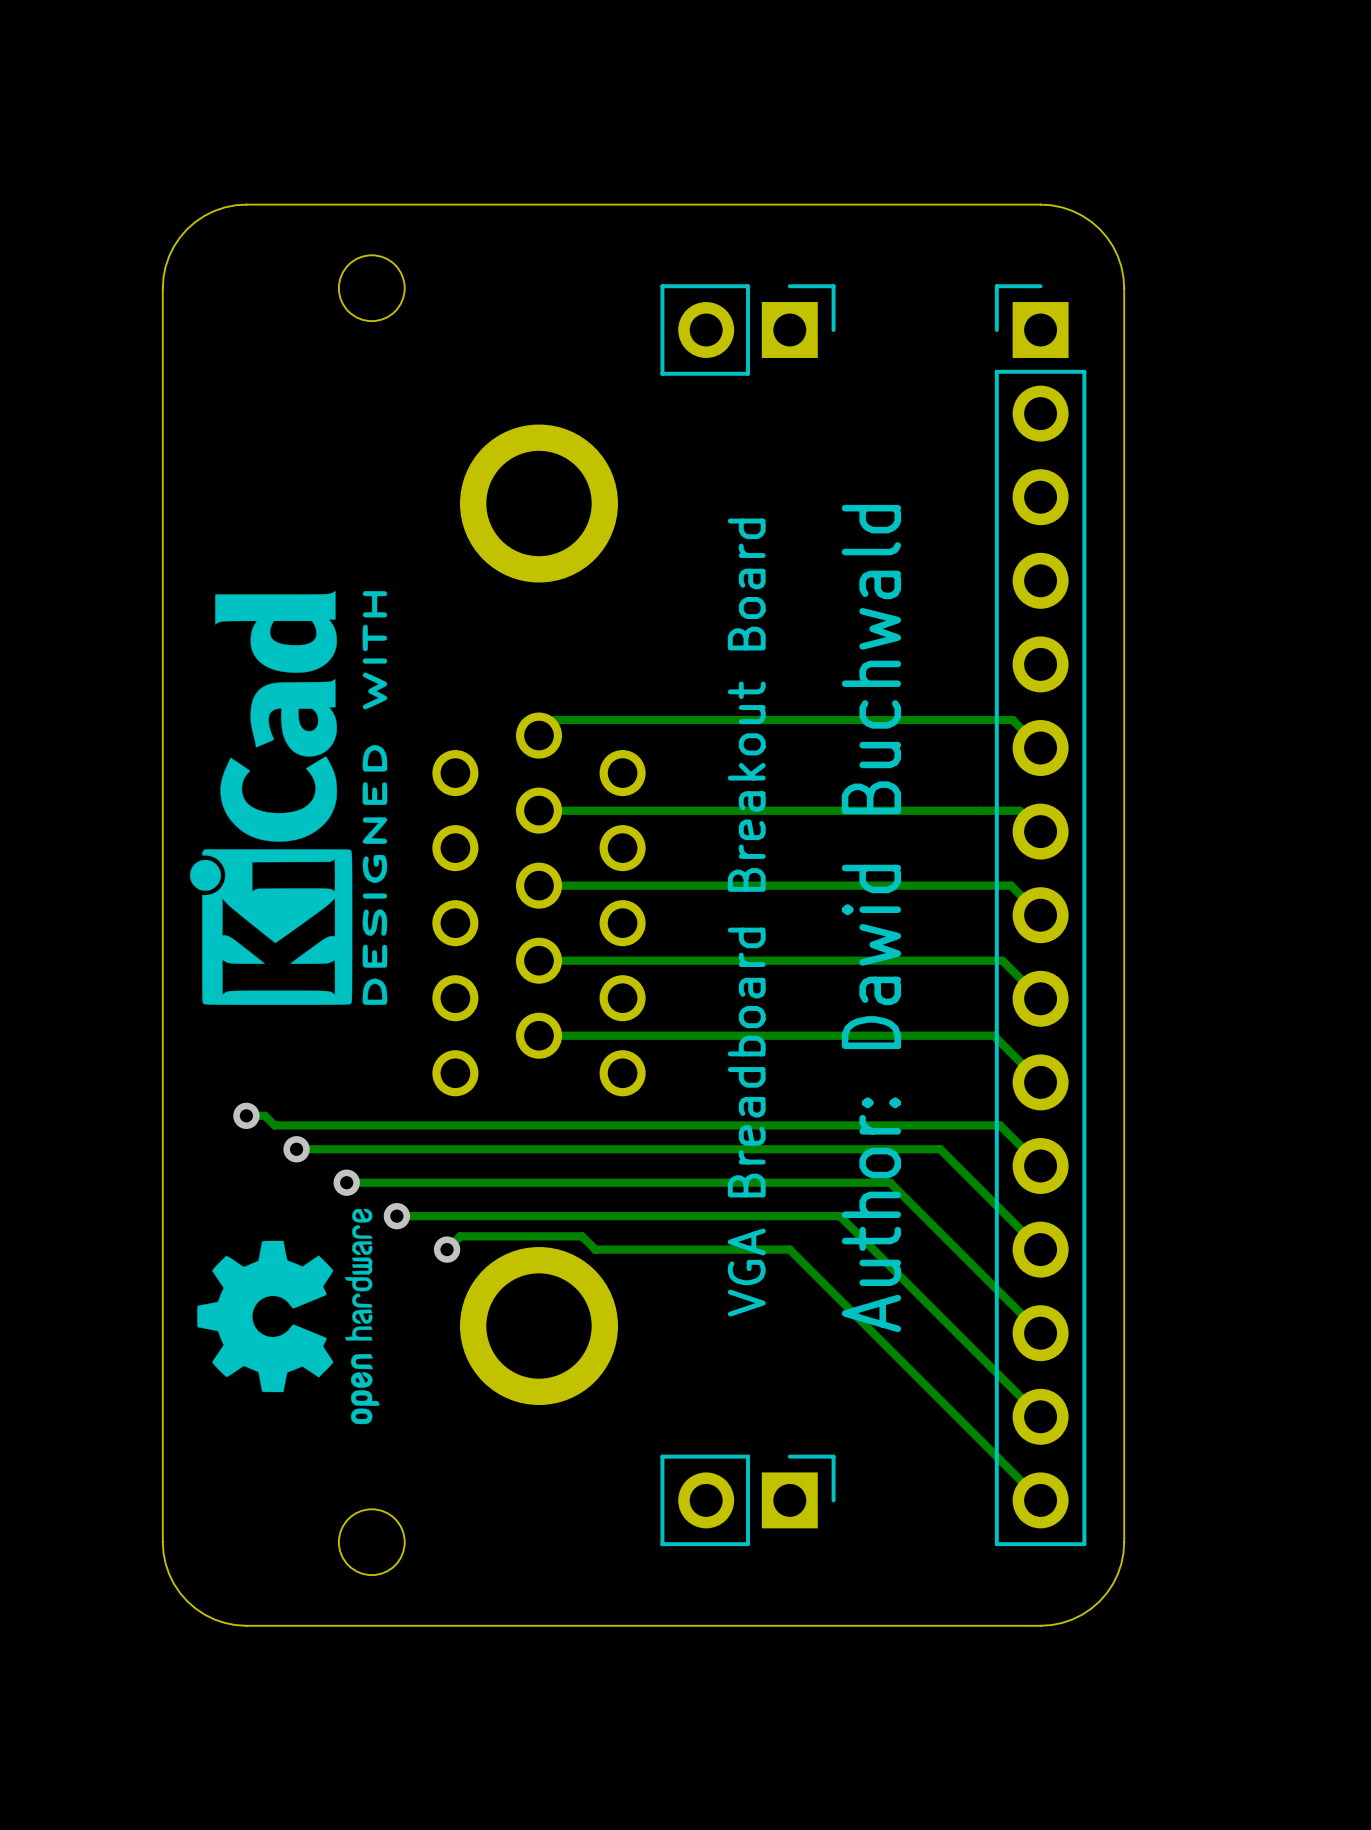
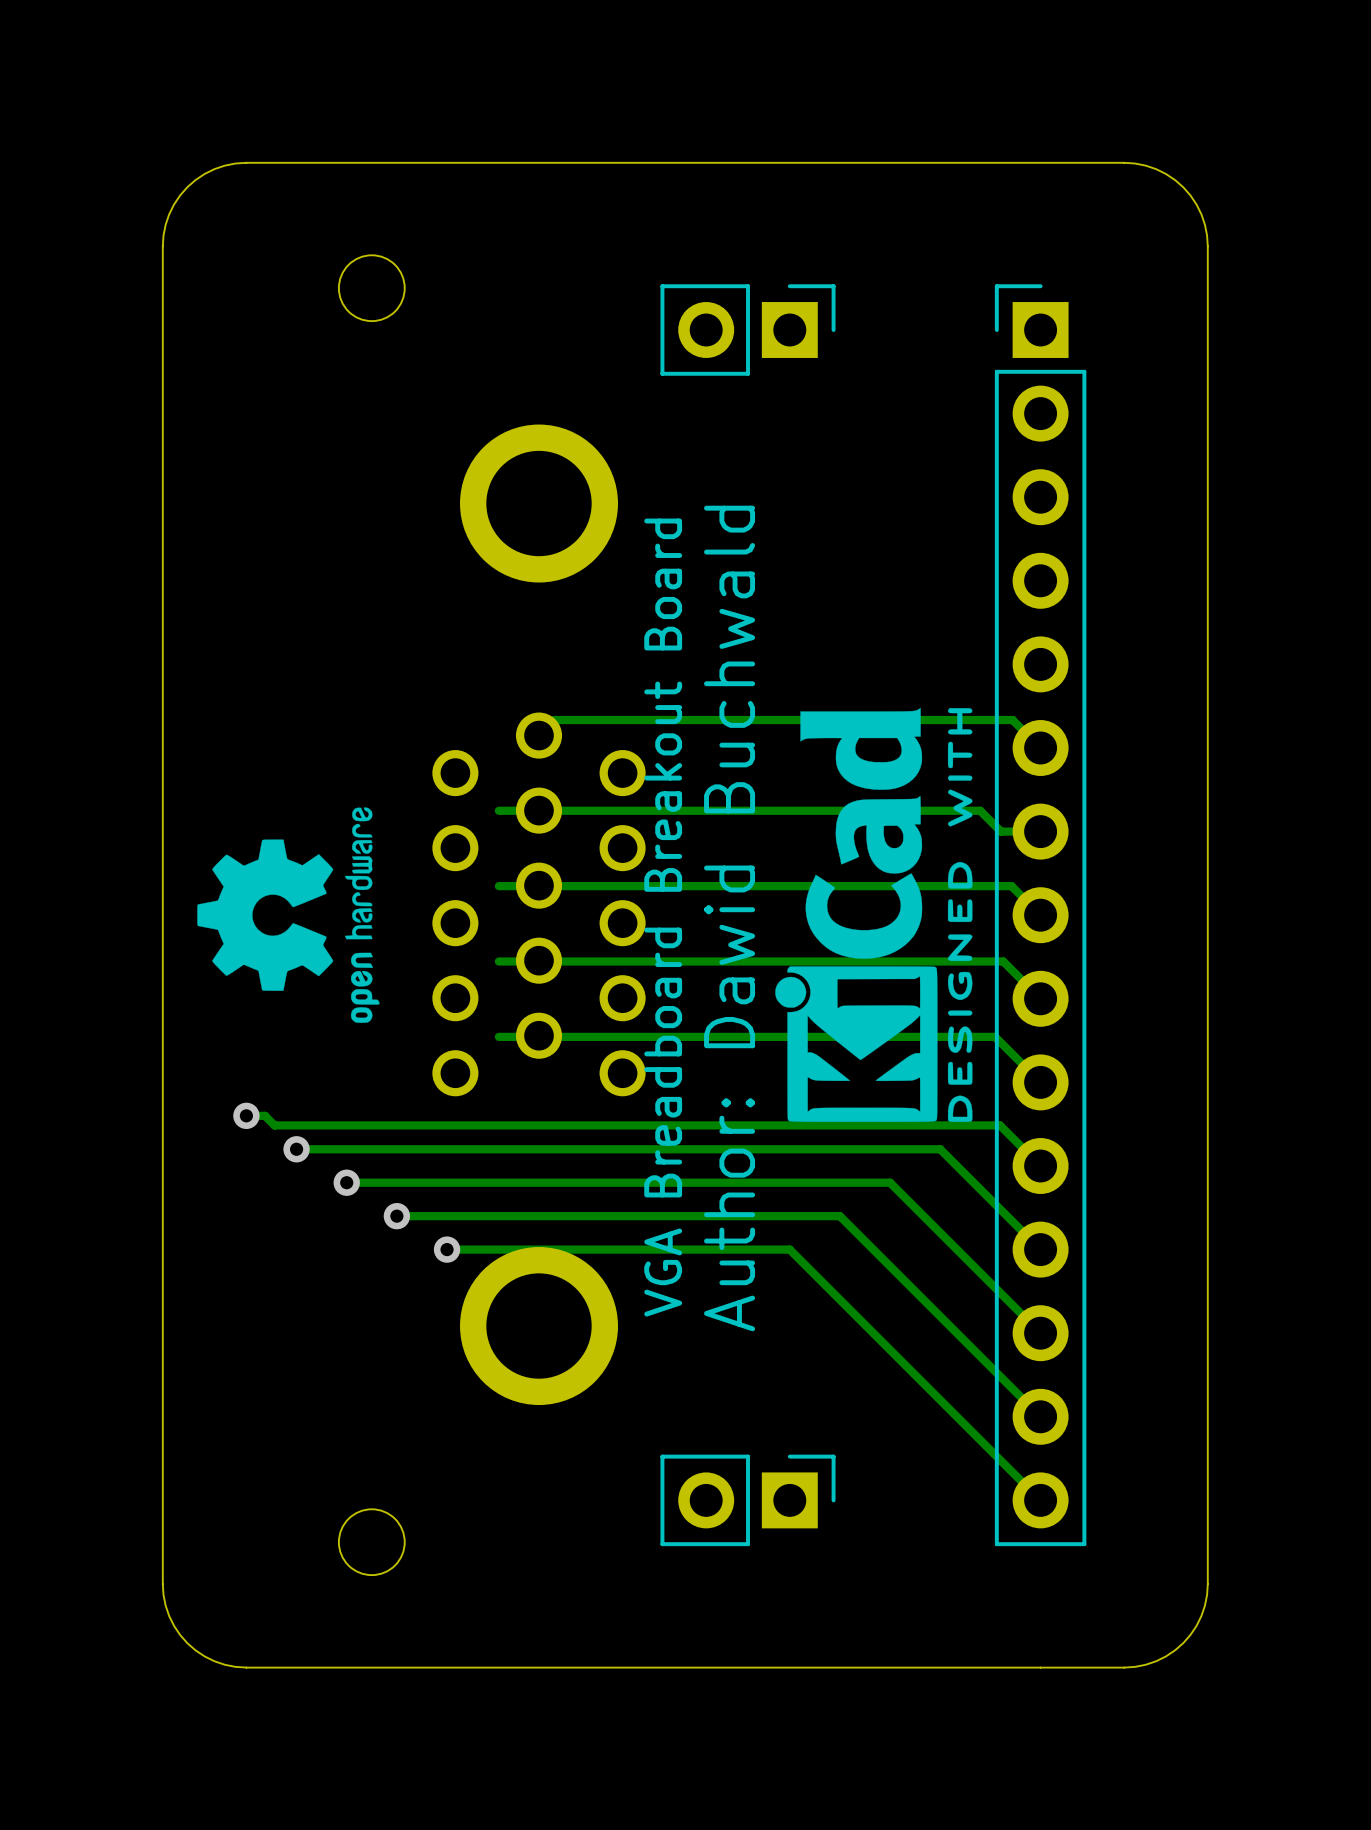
board edge: (162, 288) (169, 256) (187, 229) (214, 210) (246, 204) (1040, 204) (1062, 207) (1082, 215) (1106, 237) (1121, 266) (1124, 288) (1124, 1542) (1117, 1574) (1099, 1601) (1072, 1619) (1040, 1625) (235, 1625) (204, 1614) (180, 1593) (165, 1563) (162, 1542) -> (162, 288) (163, 235) (174, 204) (187, 187) (204, 174) (235, 163) (1124, 162) (1156, 169) (1175, 180) (1190, 195) (1201, 214) (1207, 246) (1207, 1583) (1201, 1615) (1183, 1643) (1166, 1656) (1135, 1666) (246, 1667) (224, 1664) (204, 1656) (187, 1643) (174, 1625) (163, 1594) (162, 1542)
drawing position: (288, 797) -> (873, 915)
track: none -> (536, 810) (498, 810)
track: (980, 810) (1019, 810) (1040, 831) -> (980, 810) (1001, 831) (1040, 831)
track: (539, 885) (1011, 886) -> (498, 886) (1011, 886)
text position: VGA Breadboard Breakout Board (746, 917) -> VGA Breadboard Breakout Board (663, 917)
text position: Author: Dawid Buchwald (871, 918) -> Author: Dawid Buchwald (729, 918)
track: (539, 960) (1003, 961) -> (498, 961) (1003, 961)
track: (539, 1035) (995, 1036) -> (498, 1036) (995, 1036)
track: (595, 1249) (582, 1236) (460, 1236) (447, 1249) -> (595, 1249) (447, 1249)
drawing position: (288, 1316) -> (288, 915)

